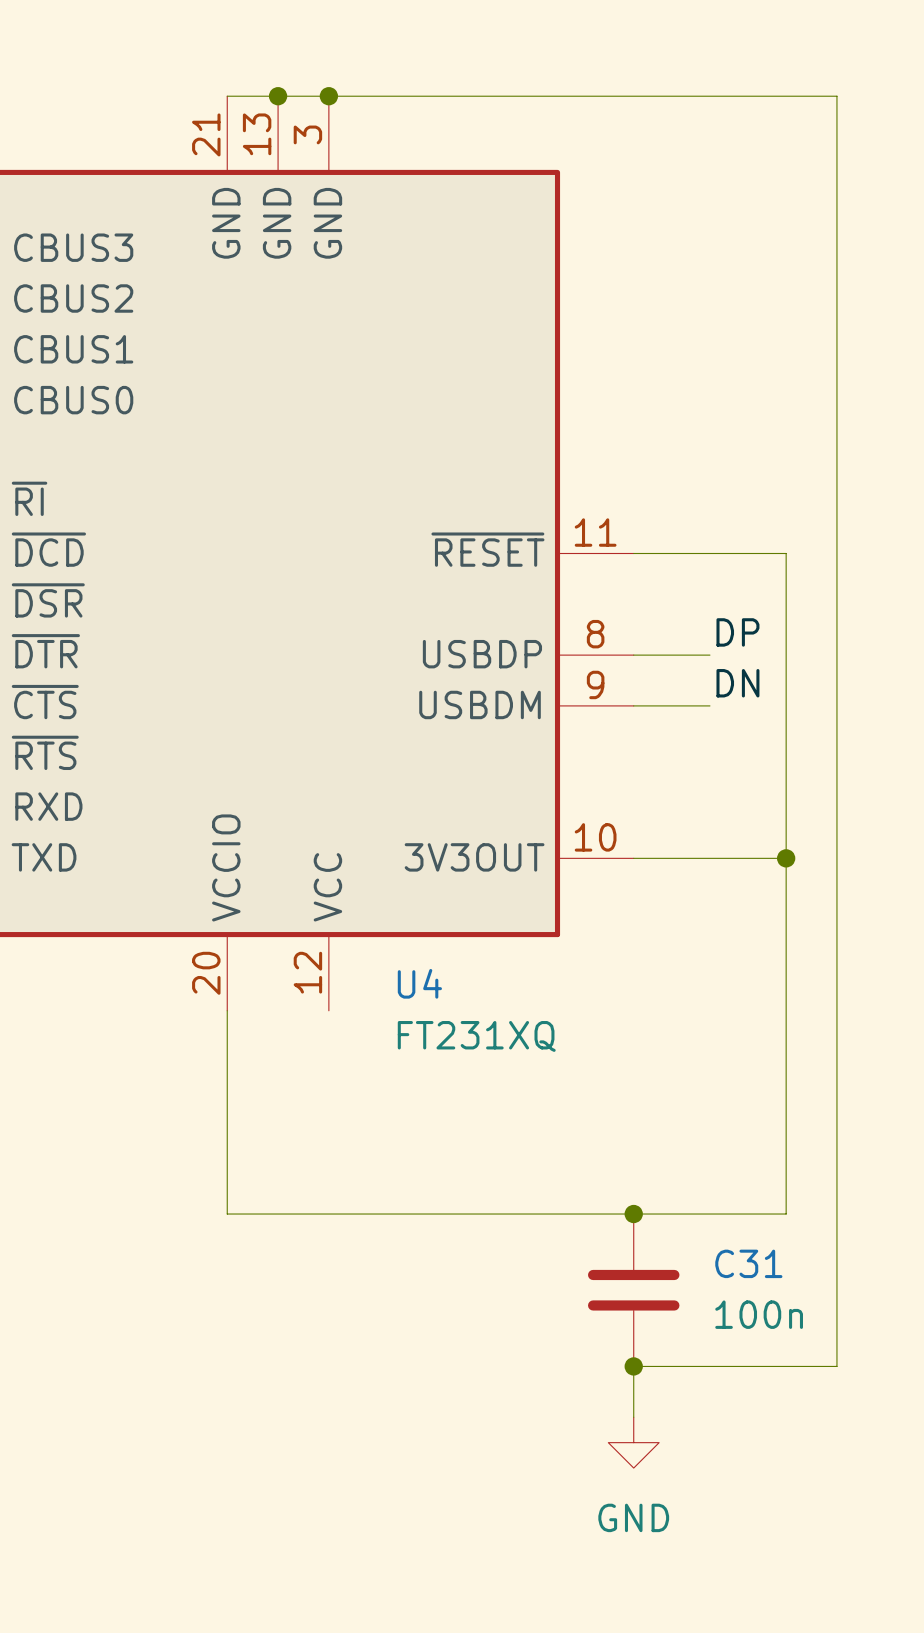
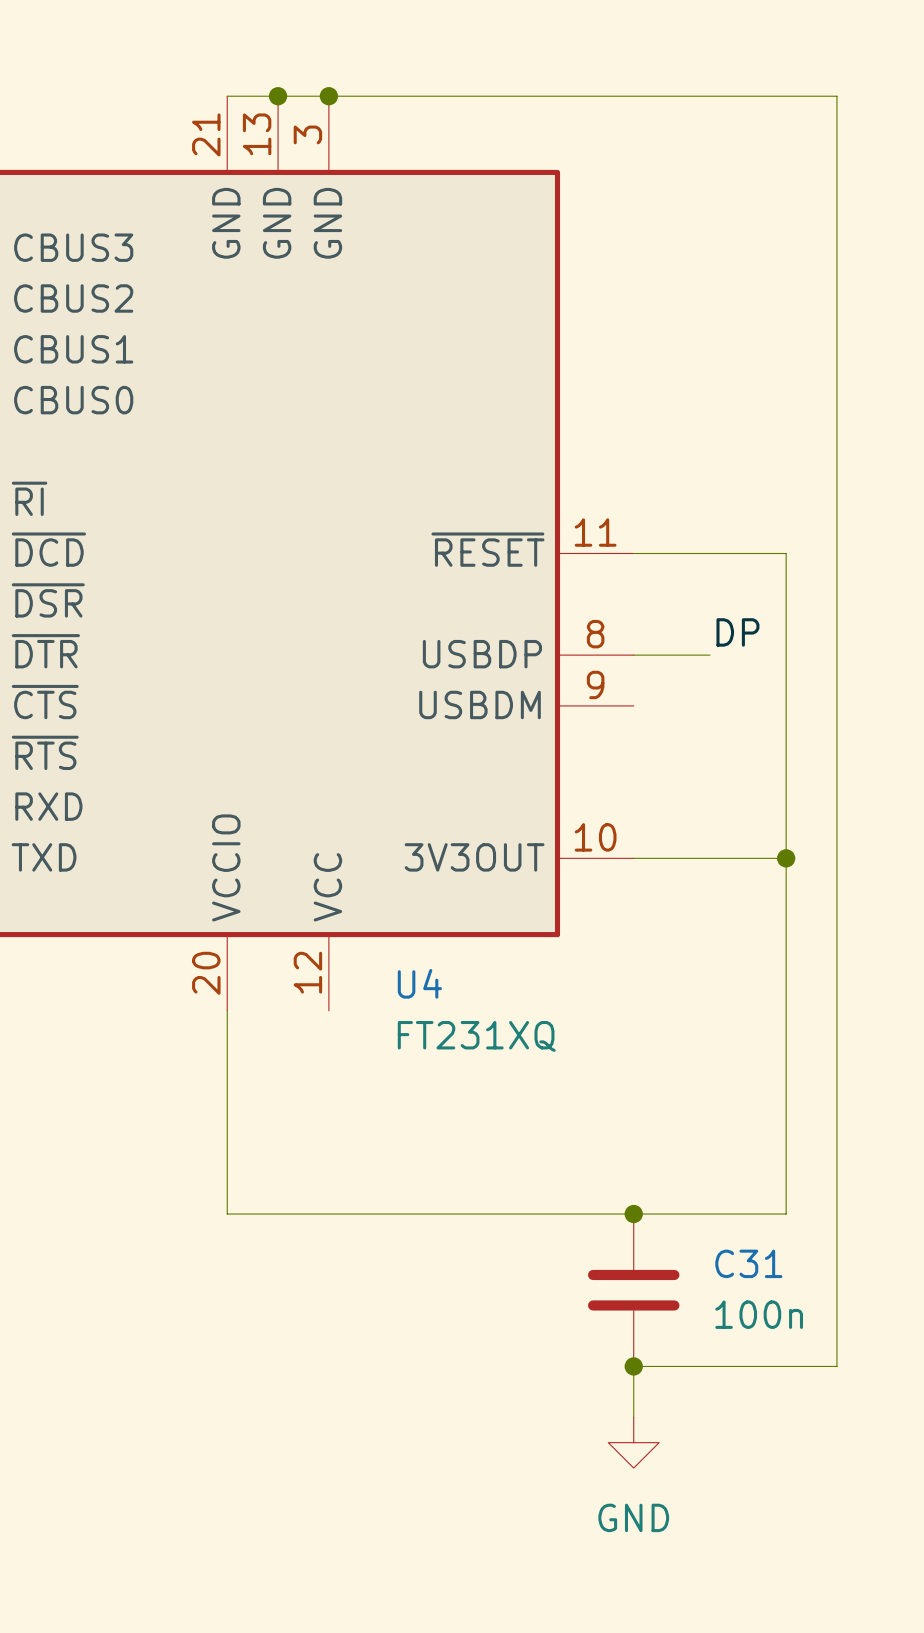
label: DN (737, 683) -> none
wire: (633, 705) (709, 705) -> none

